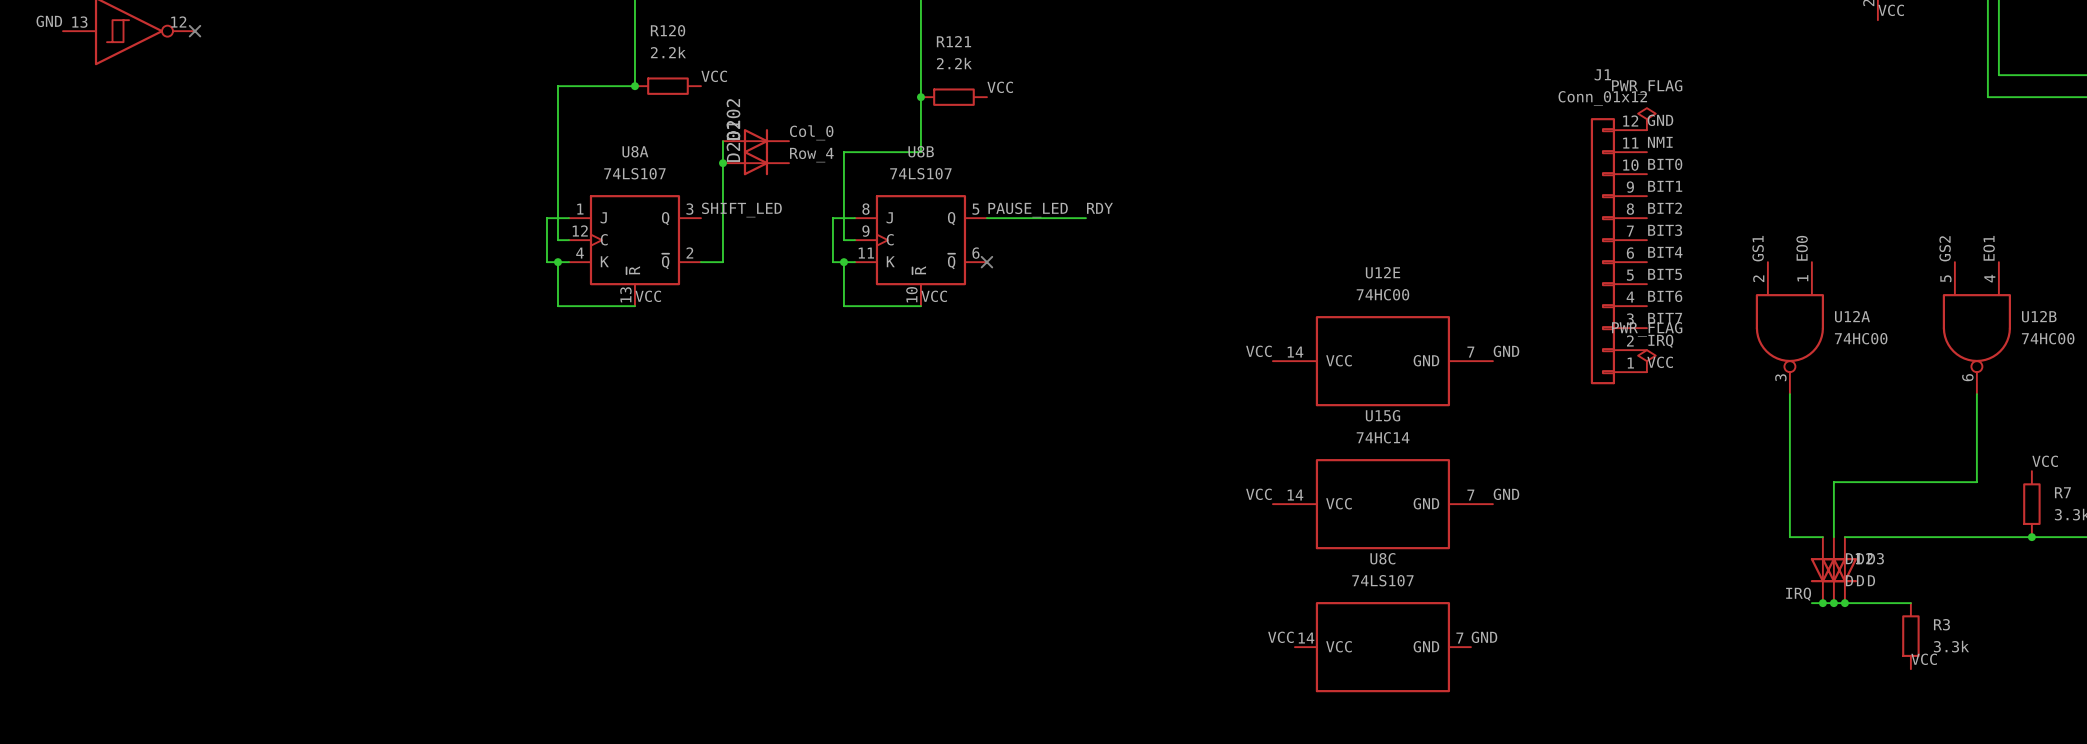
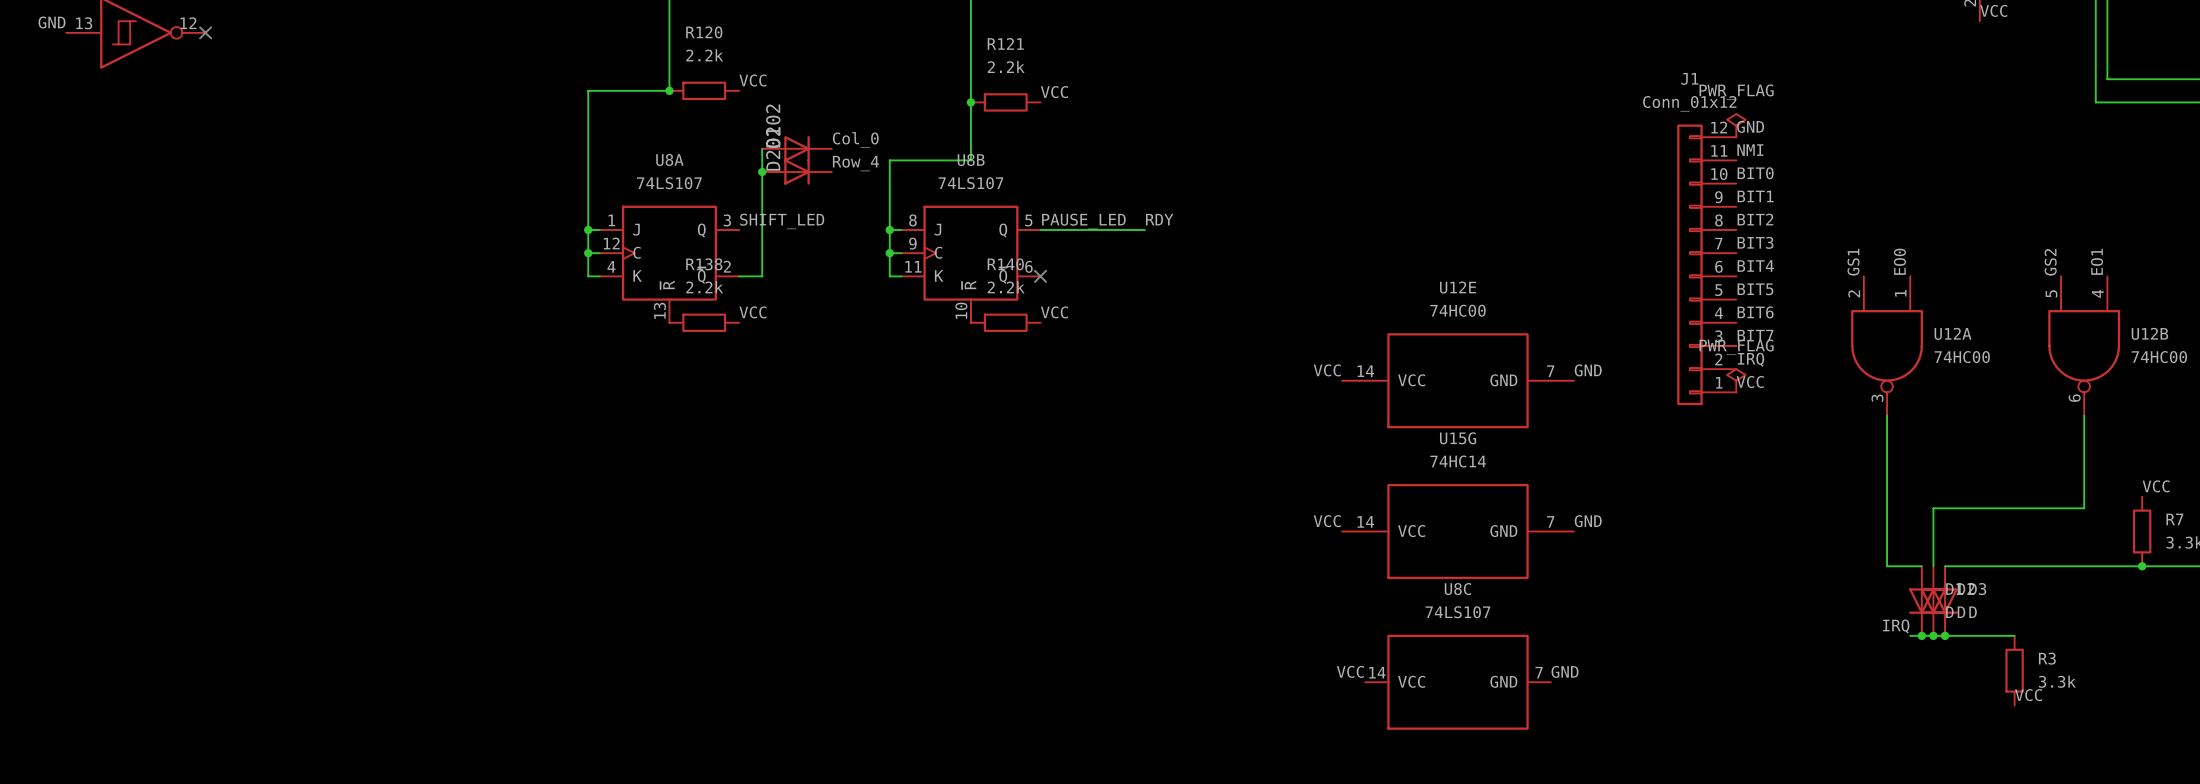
wire: (557, 218) (546, 218) (546, 262) (557, 262) (557, 306) (634, 306) -> none
junction: none -> (588, 229)
wire: (843, 218) (832, 218) (832, 262) (843, 262) (843, 306) (920, 306) -> none
junction: none -> (889, 229)
wire: none -> (588, 253) (588, 276)
junction: none -> (588, 253)
wire: none -> (889, 253) (889, 276)
junction: none -> (889, 253)
junction: (557, 262) -> none
junction: (843, 262) -> none
label position: VCC (648, 296) -> VCC (752, 312)
label position: VCC (934, 296) -> VCC (1054, 312)
R138: none -> 2.2k (704, 322)
R140: none -> 2.2k (1005, 322)

